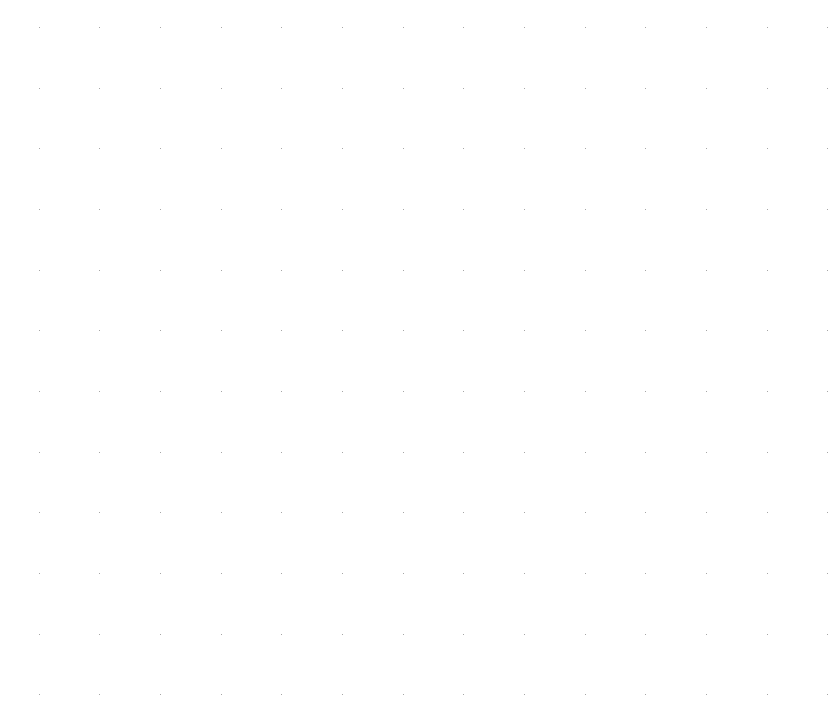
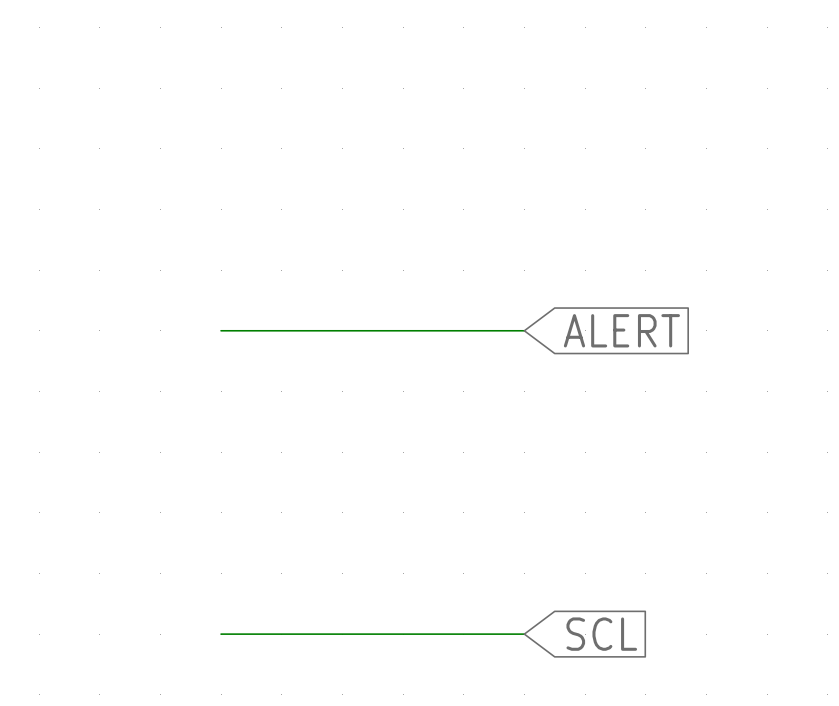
wire: none -> (221, 330) (524, 330)
global label: none -> ALERT (621, 330)
wire: none -> (221, 634) (524, 634)
global label: none -> SCL (601, 634)

